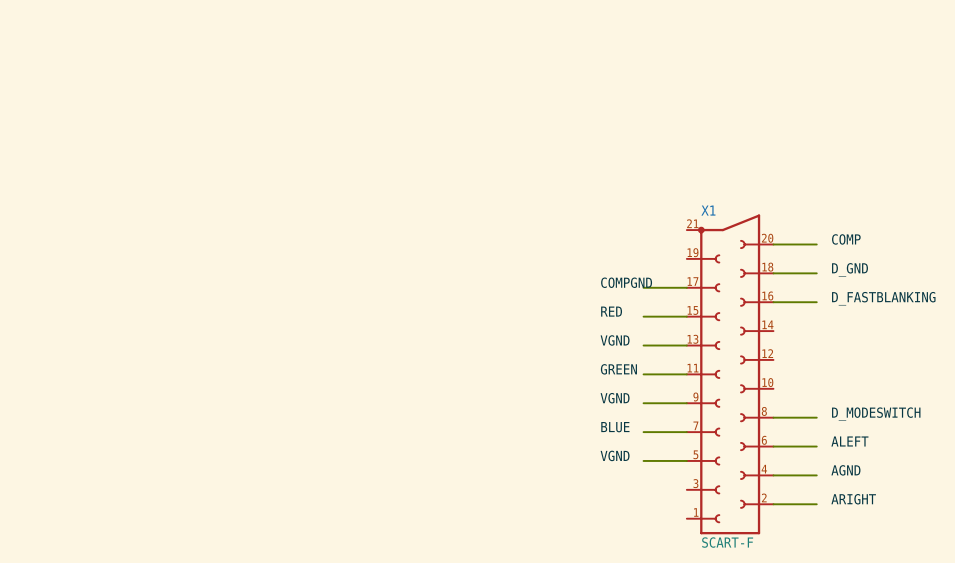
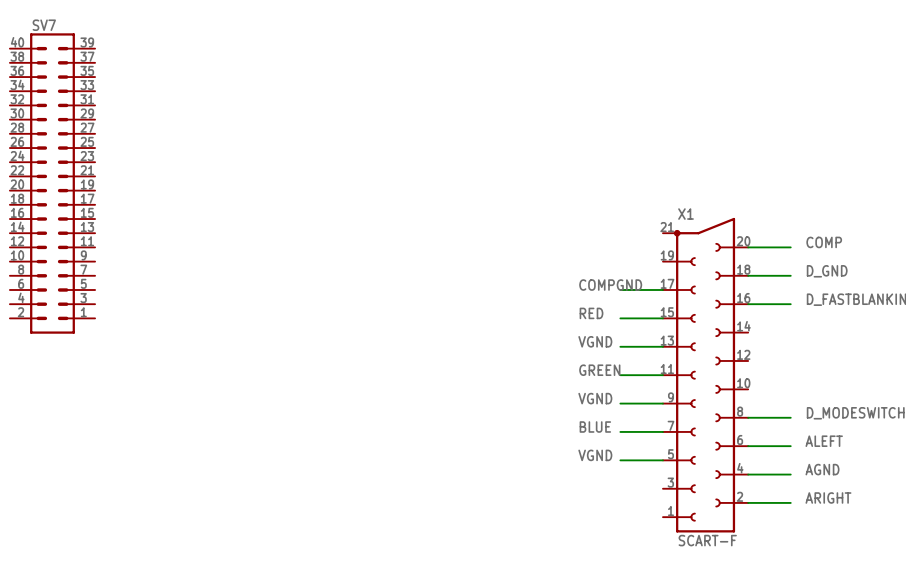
SV7: none -> (52, 183)

